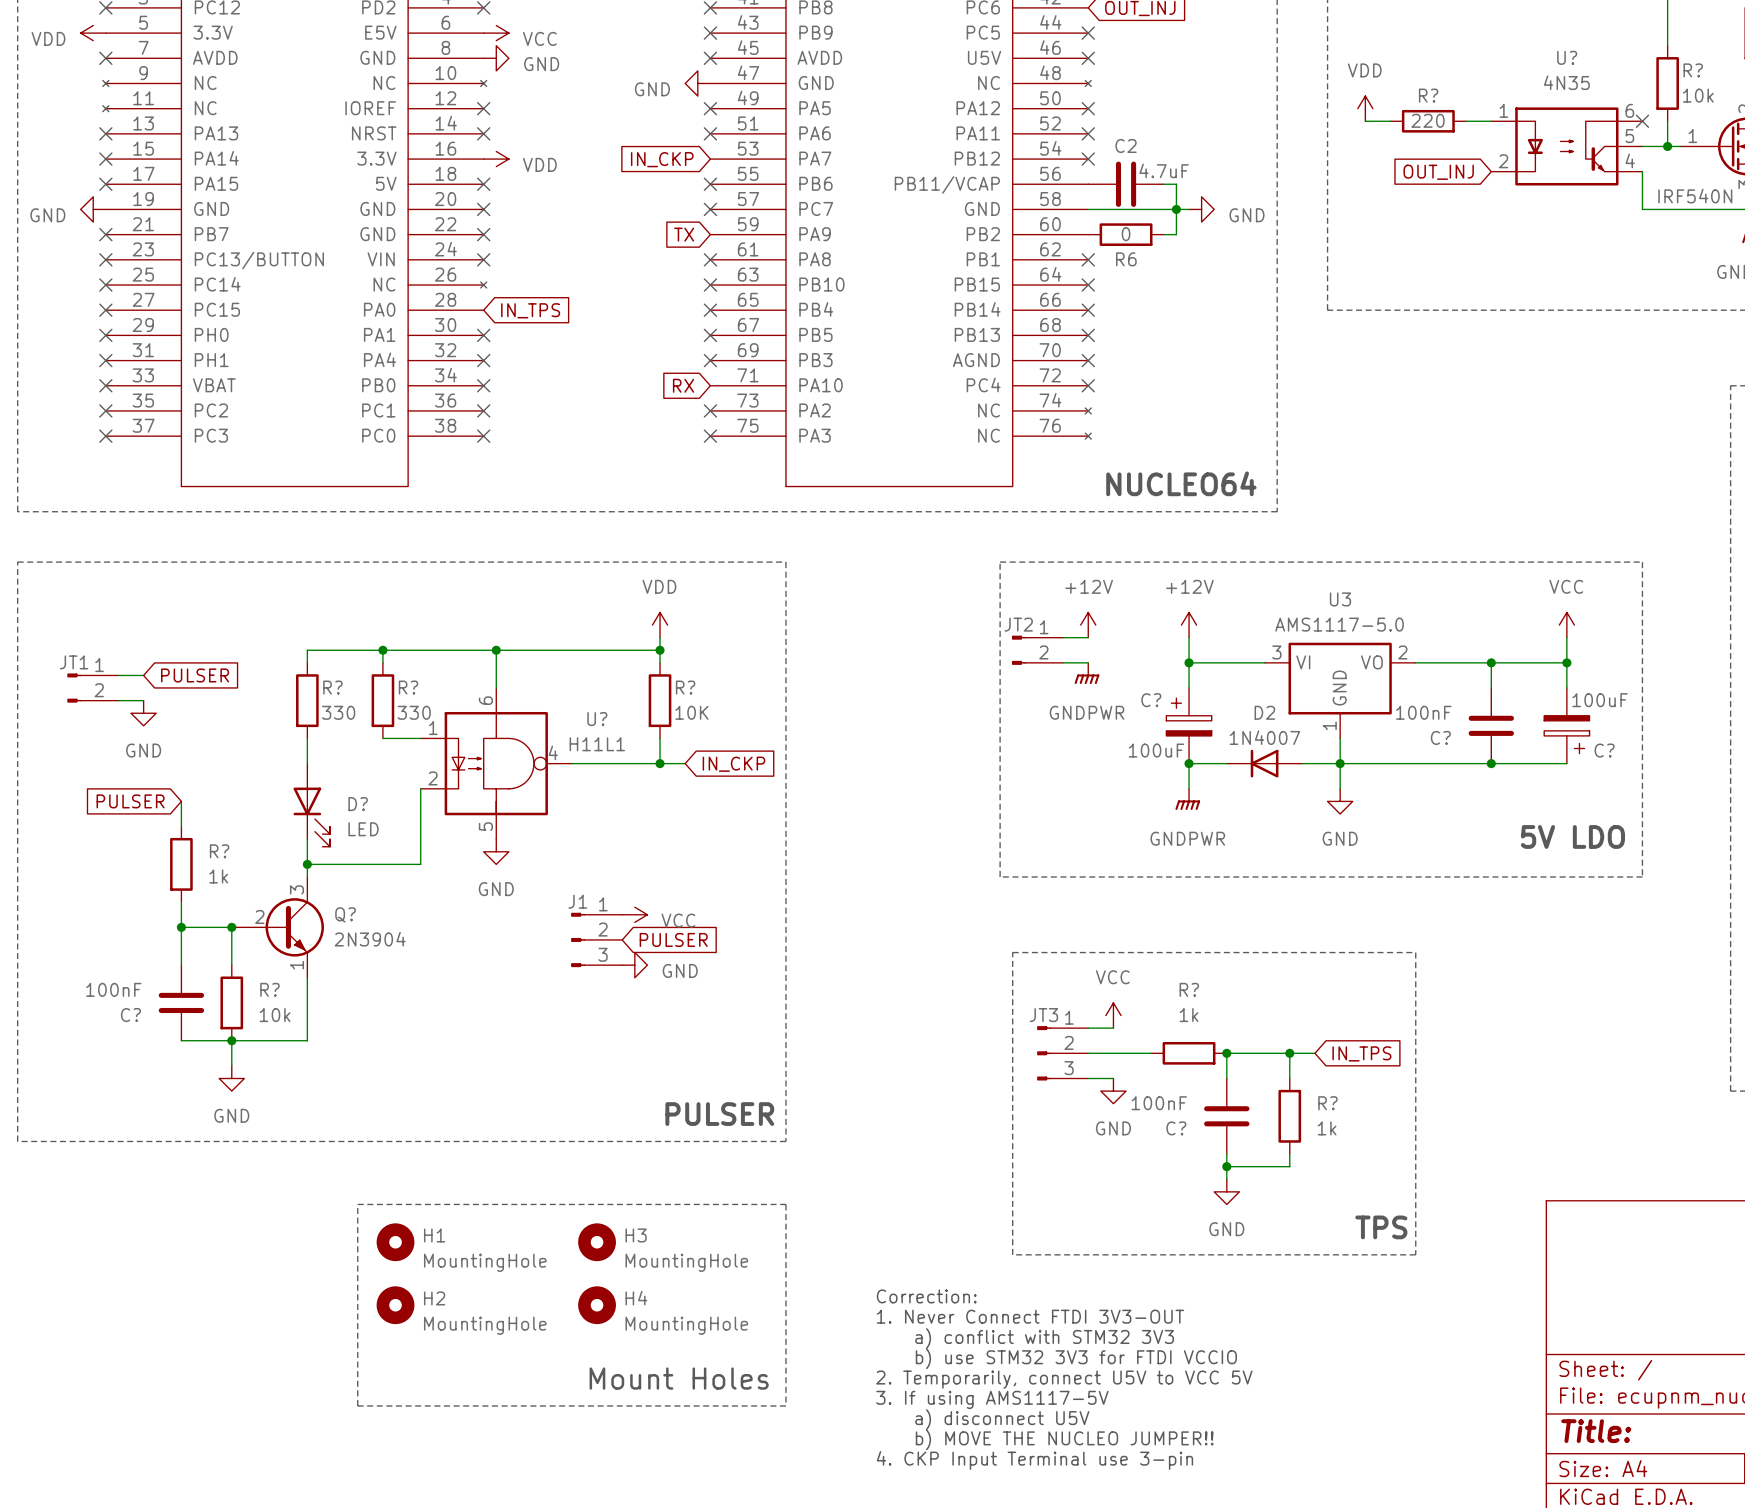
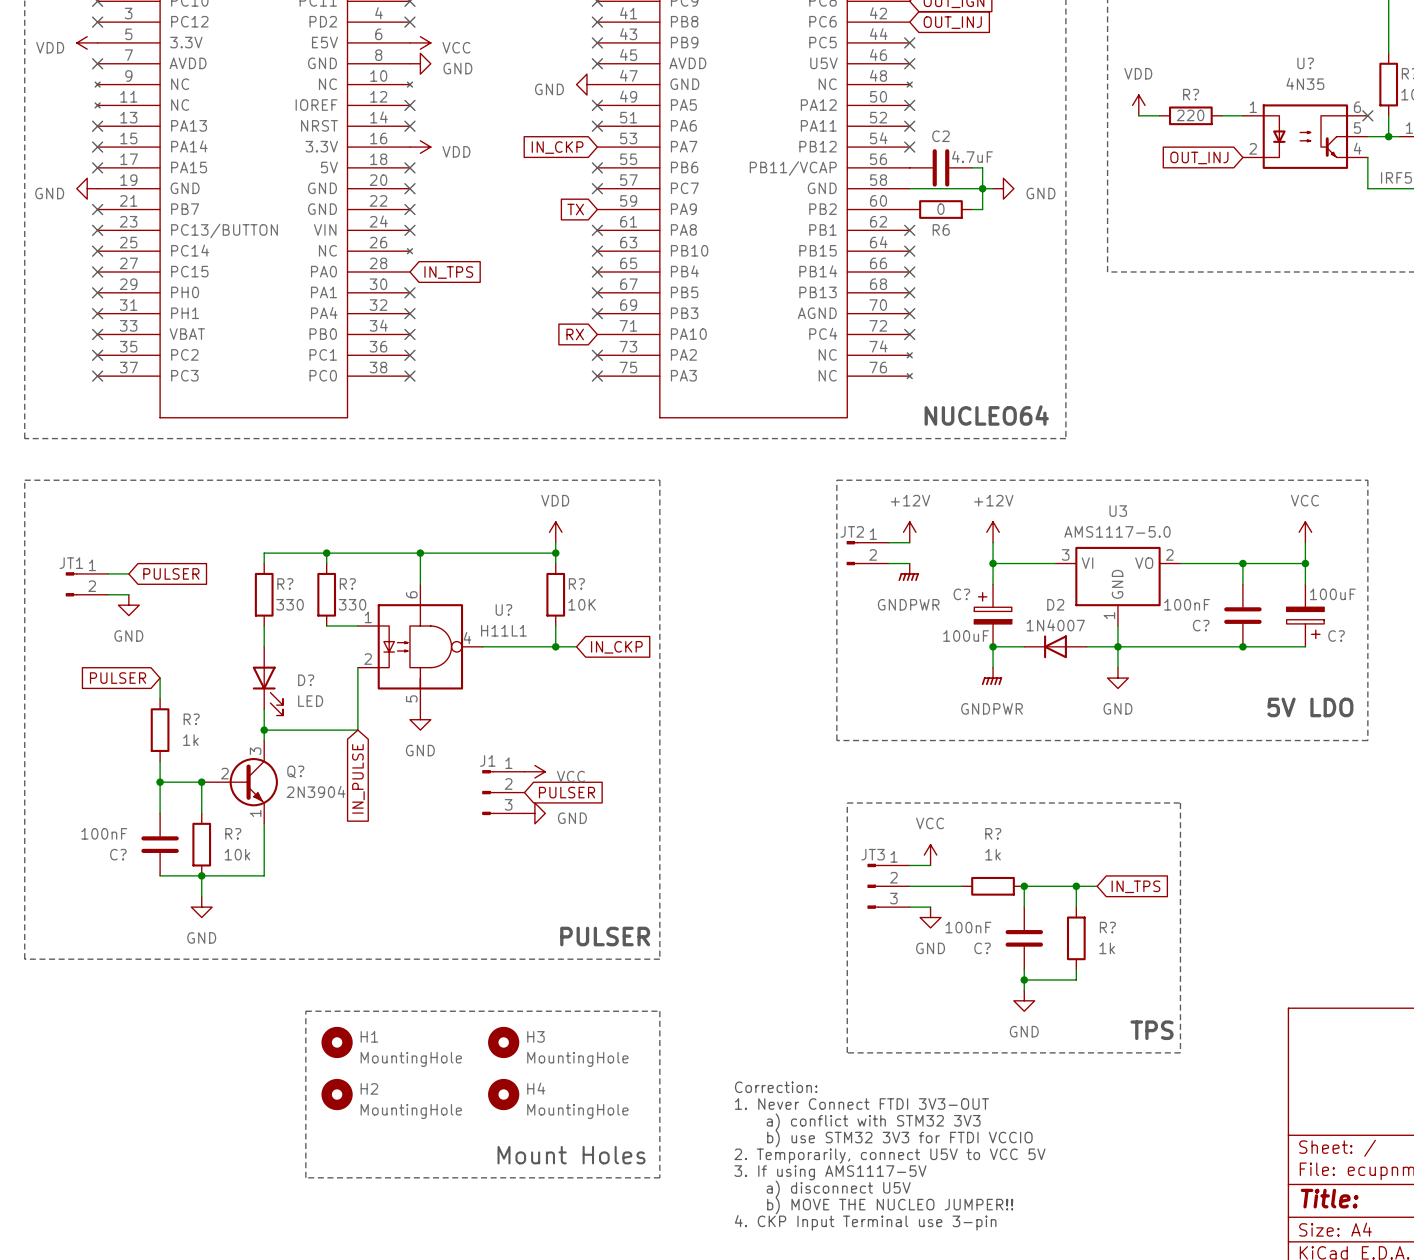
global label: none -> IN_PULSE (358, 778)

